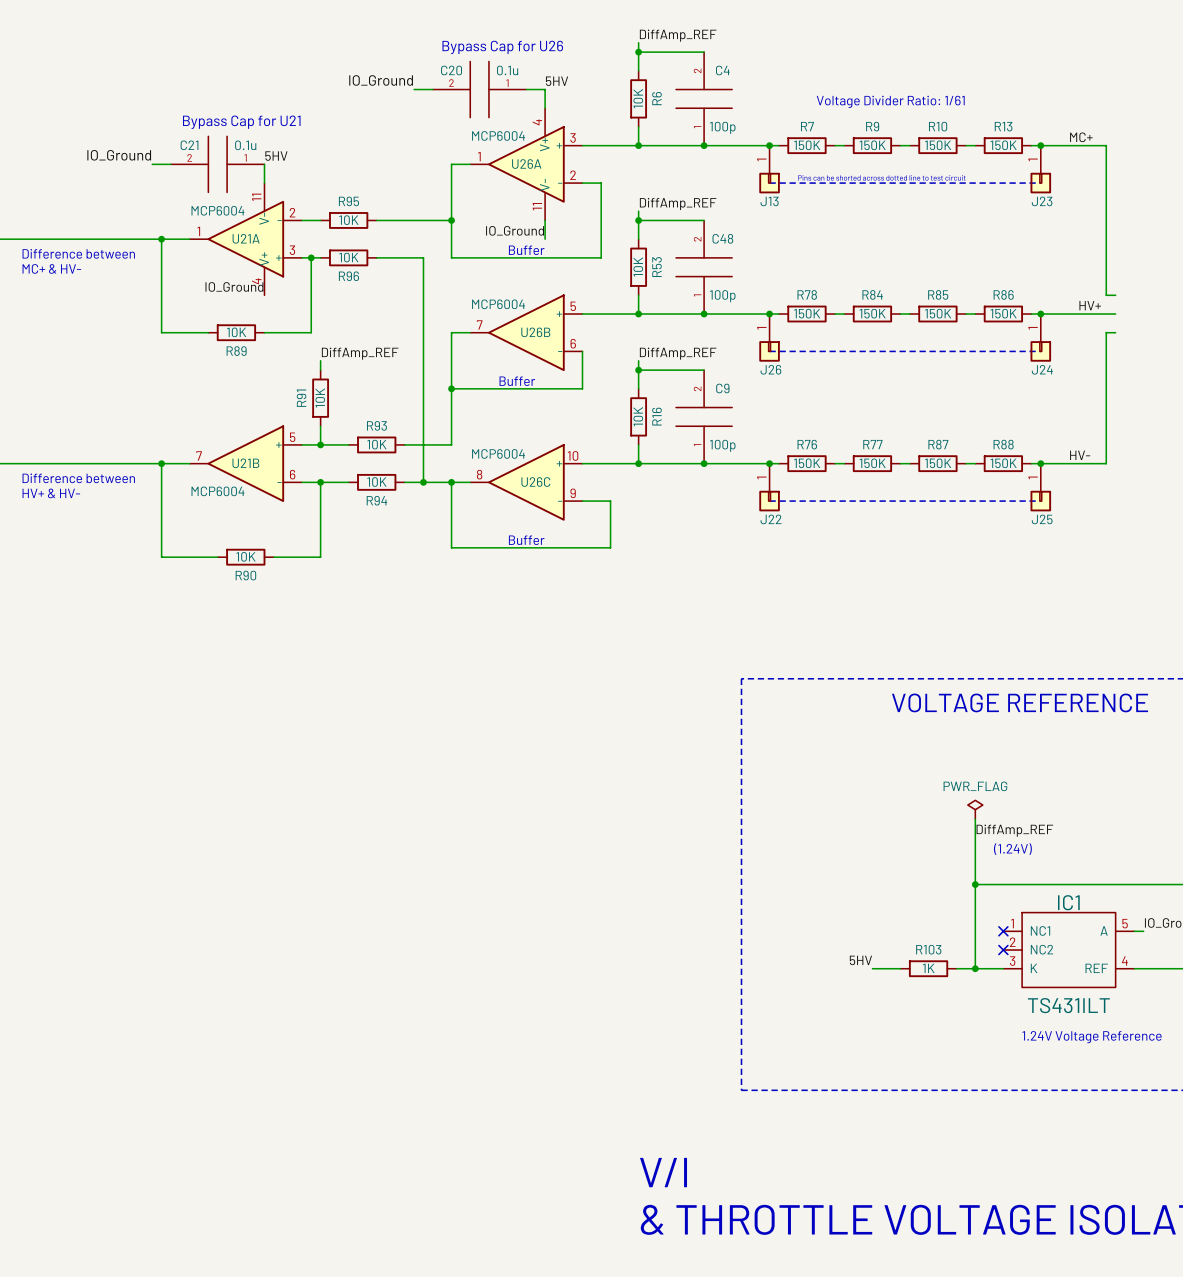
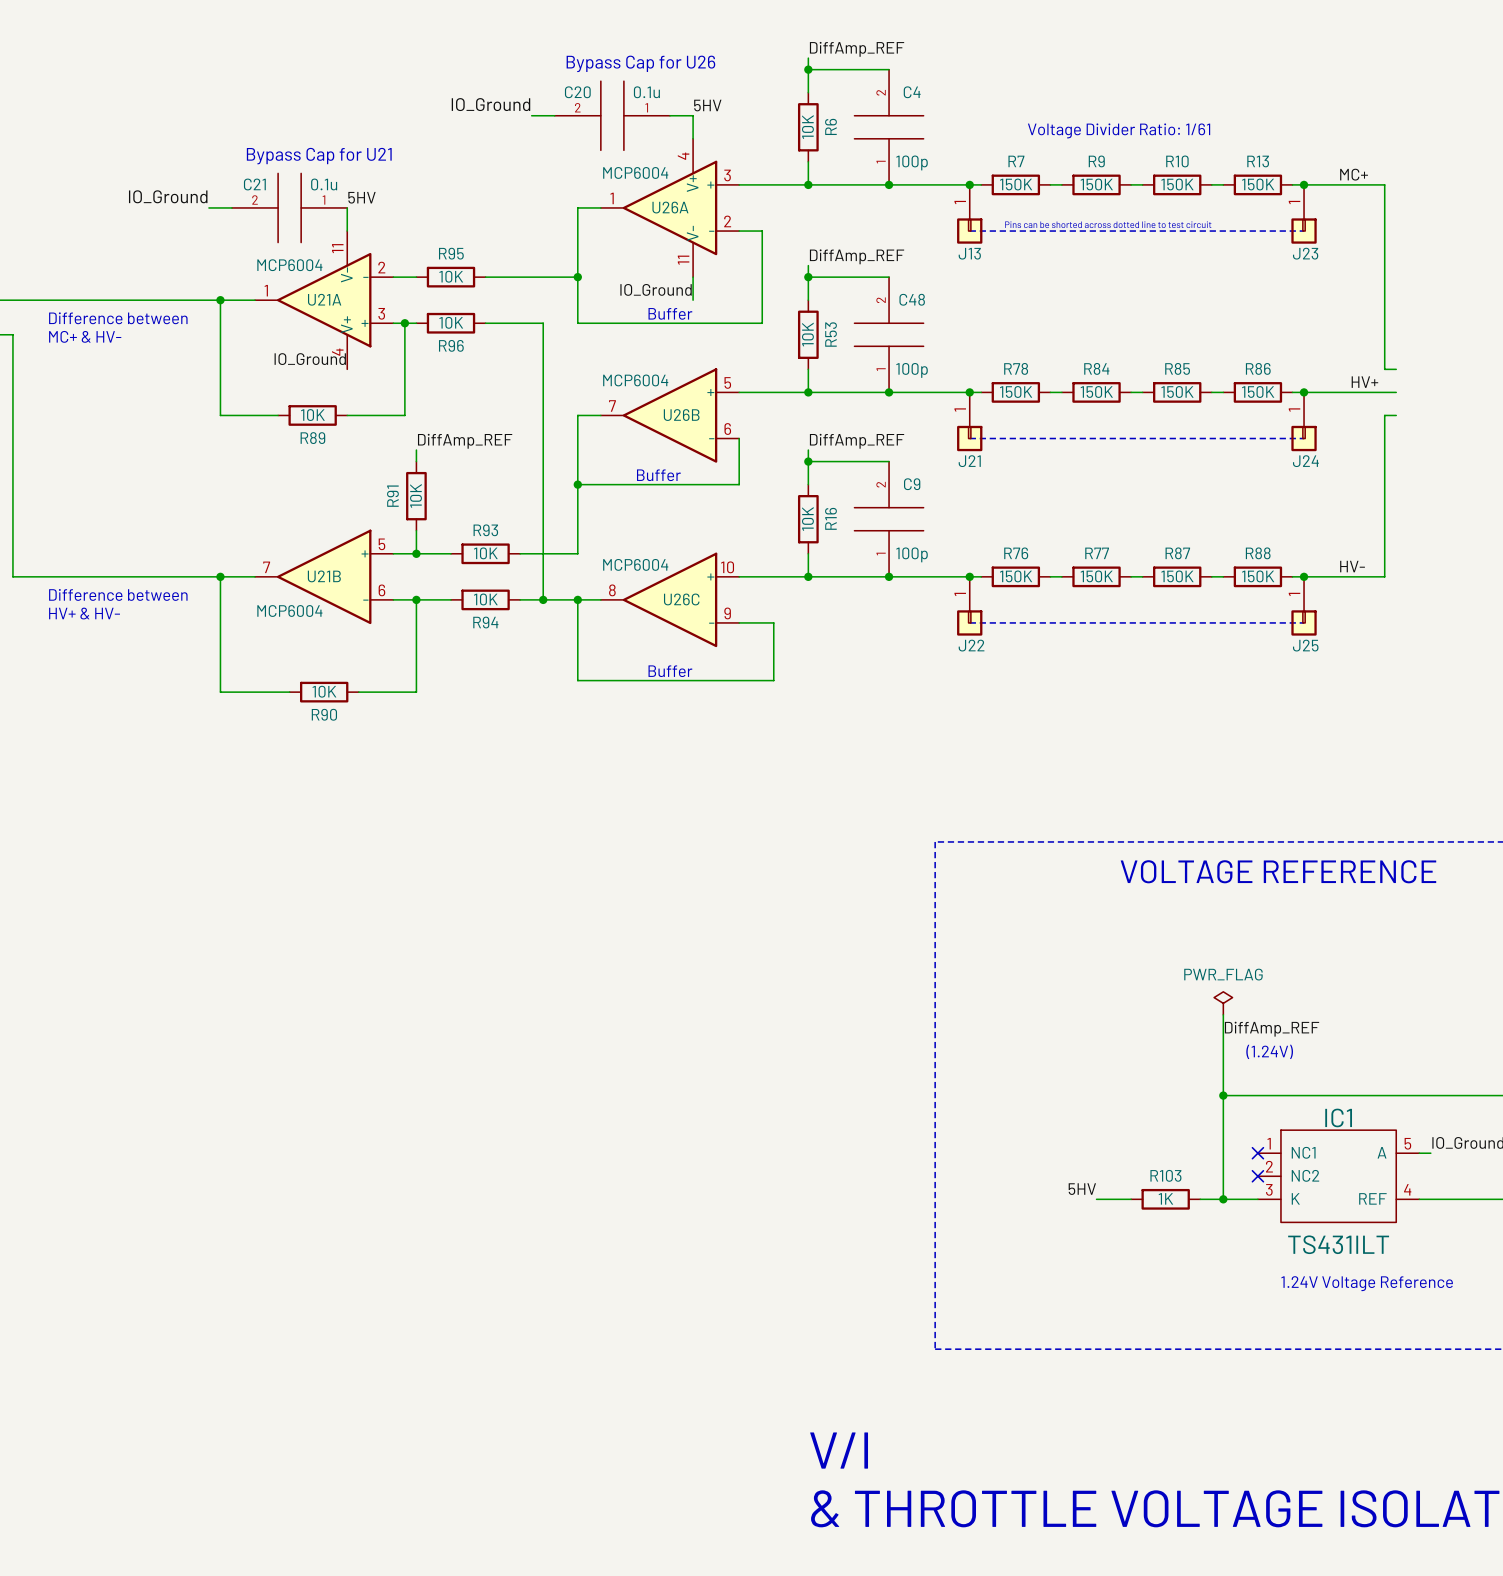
J26 name: J26 (770, 369) -> J21 (969, 461)

